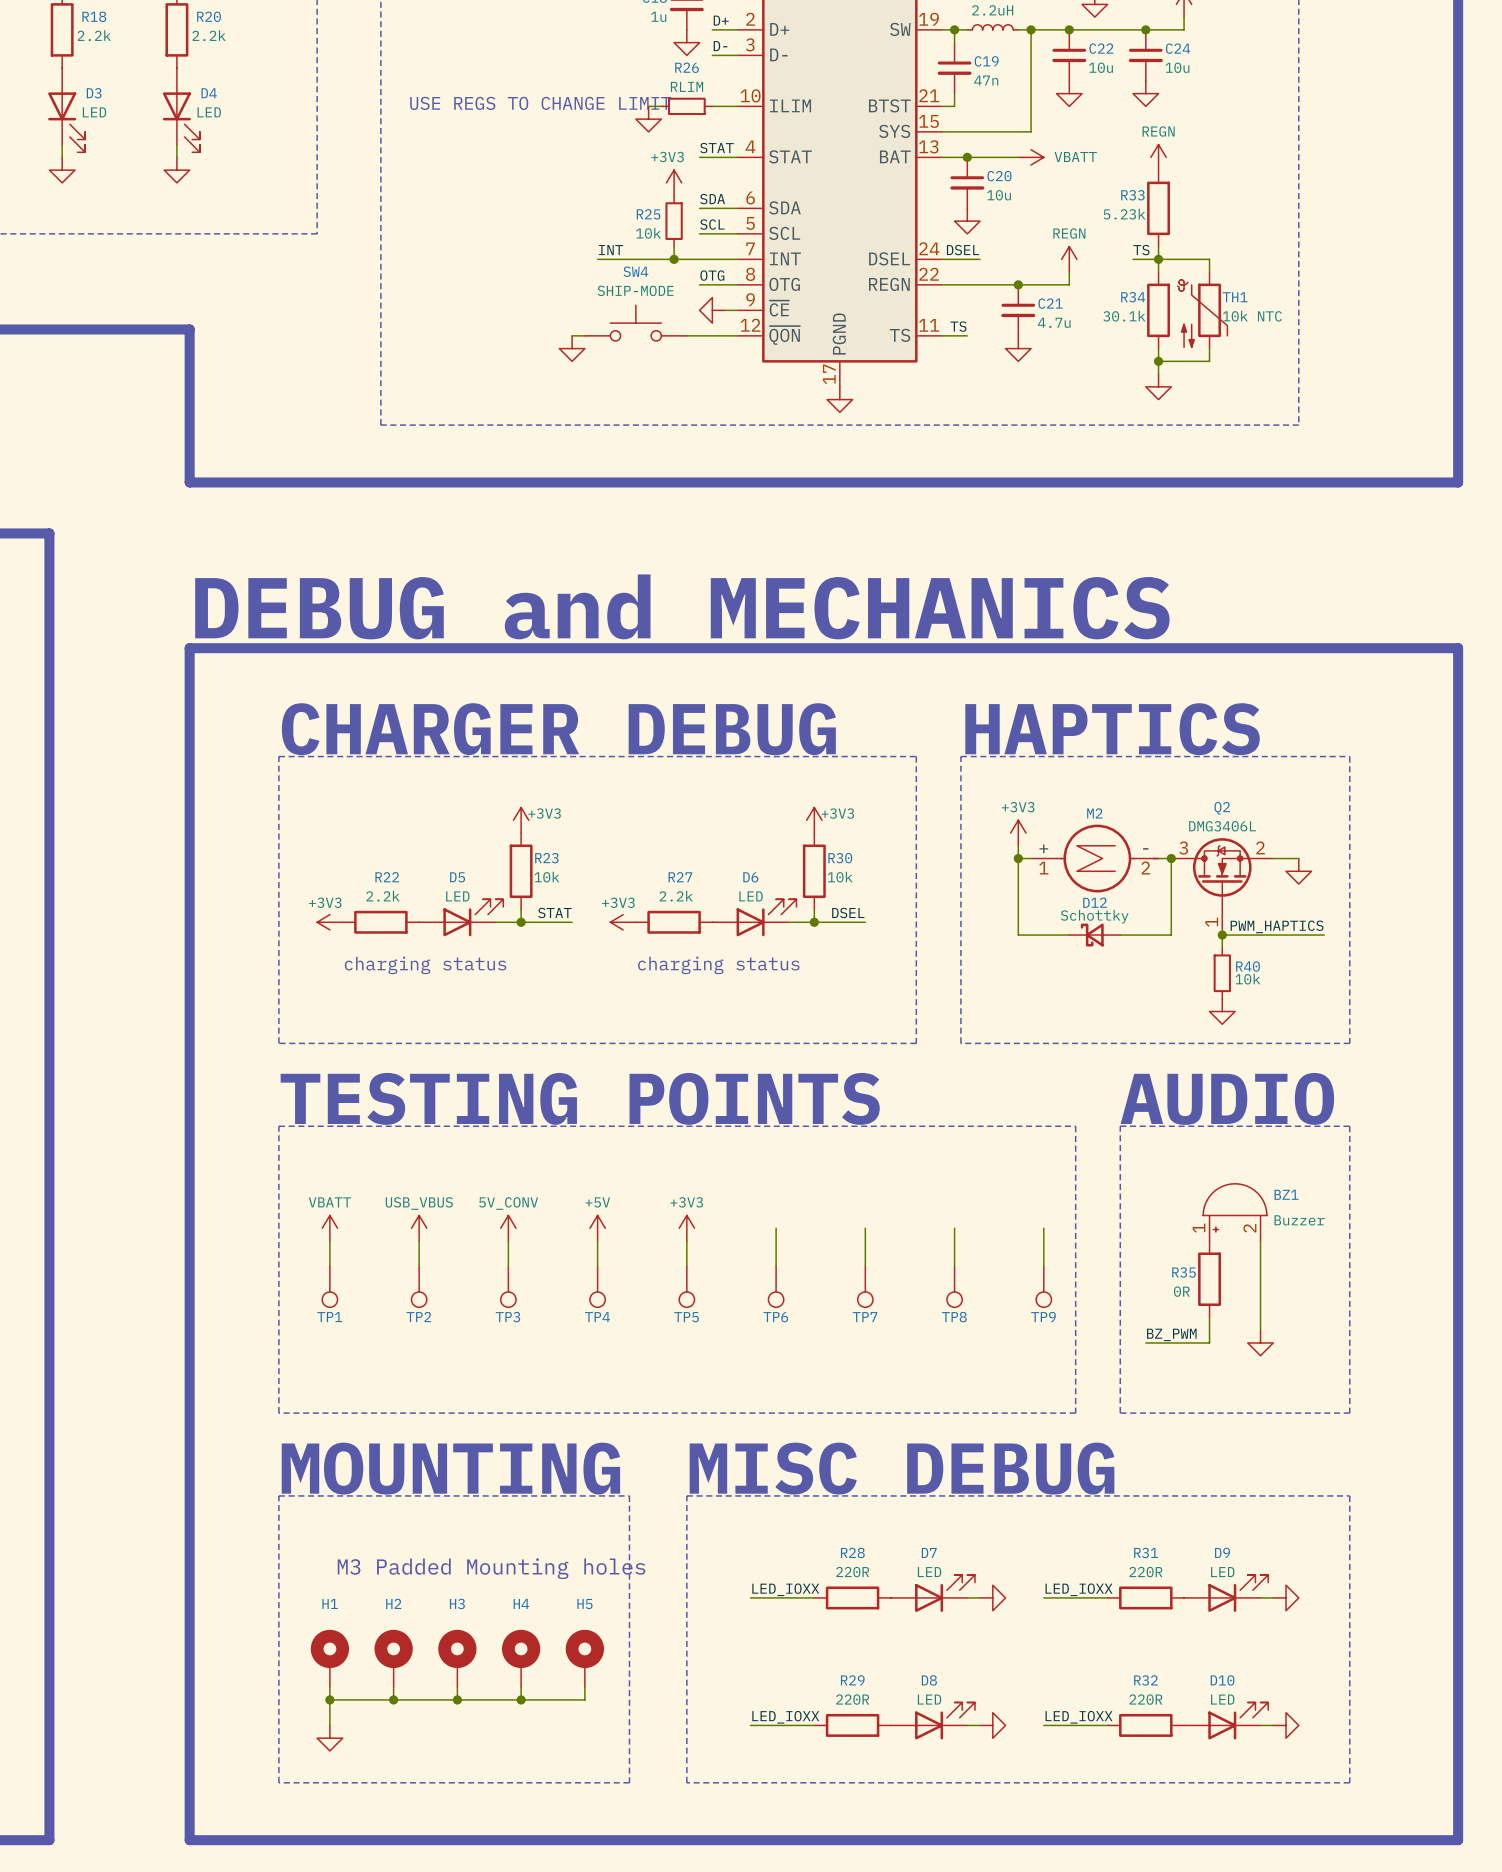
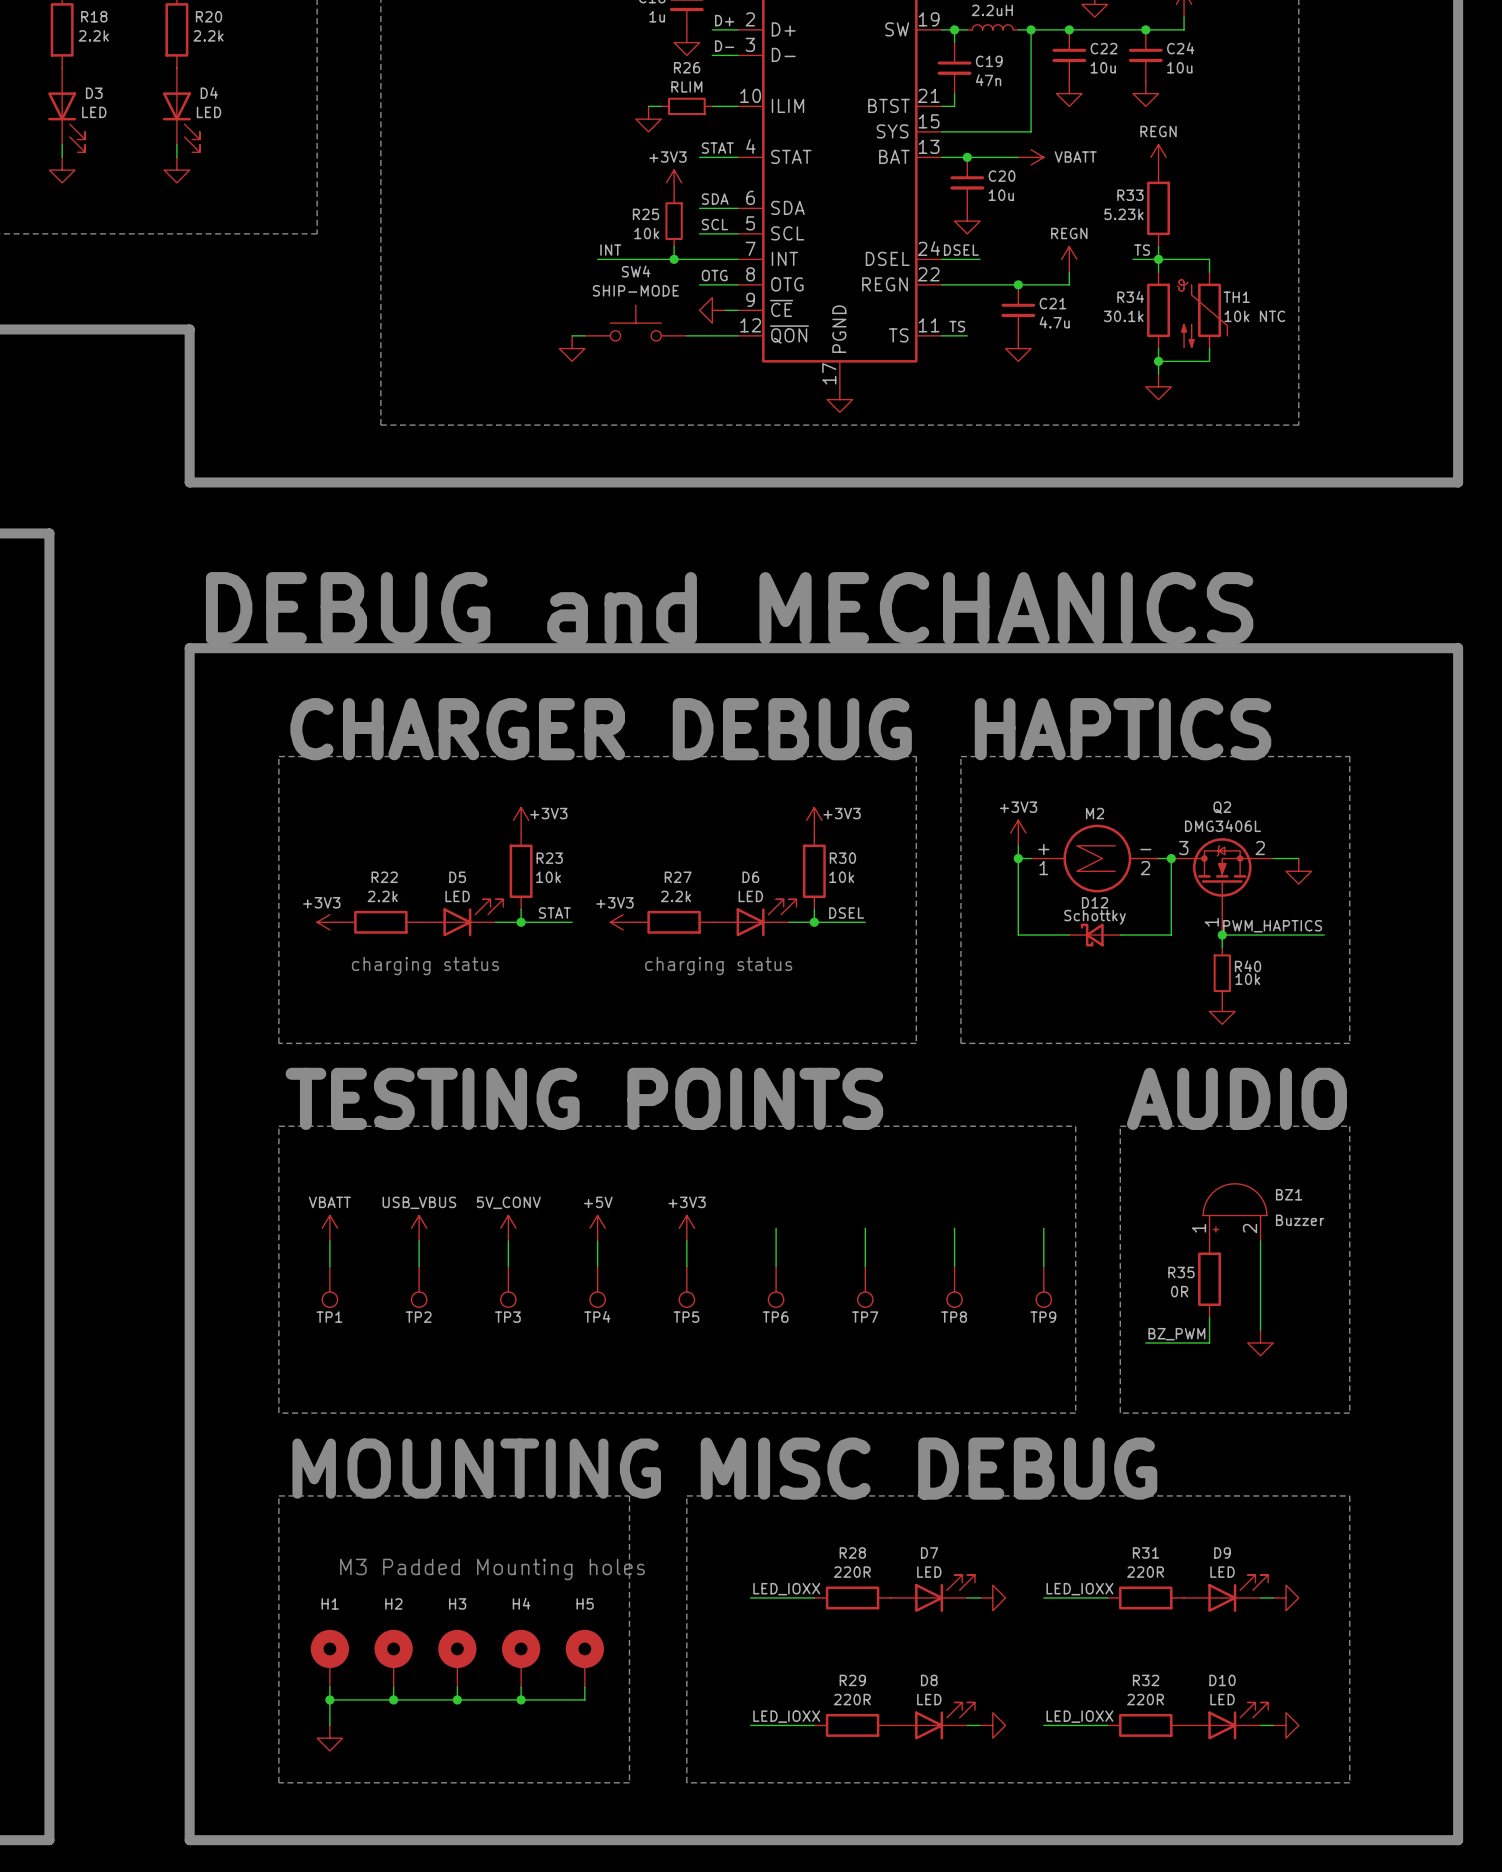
text: USE REGS TO CHANGE LIMIT (540, 103) -> none

